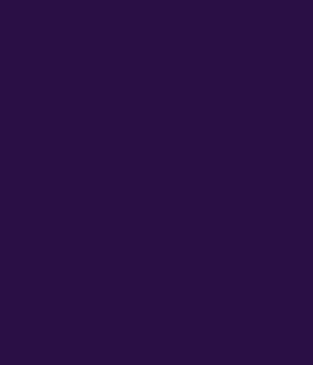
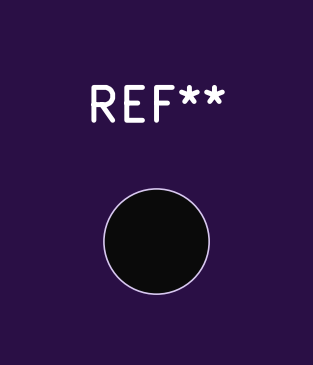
REF**: none -> (156, 241)

